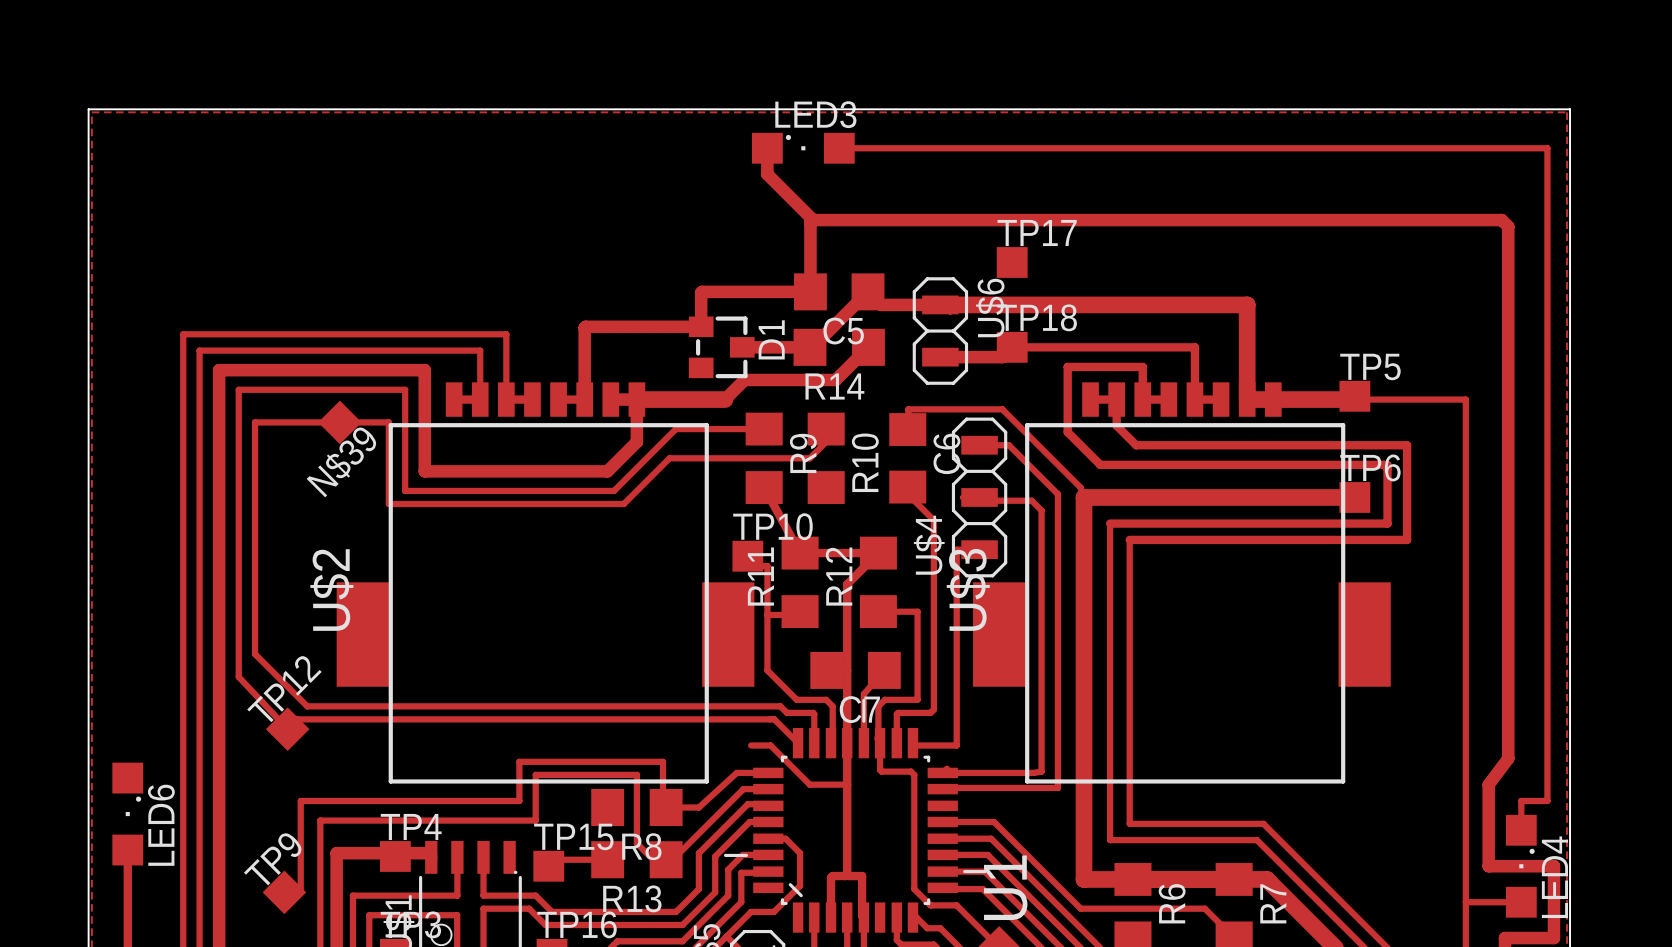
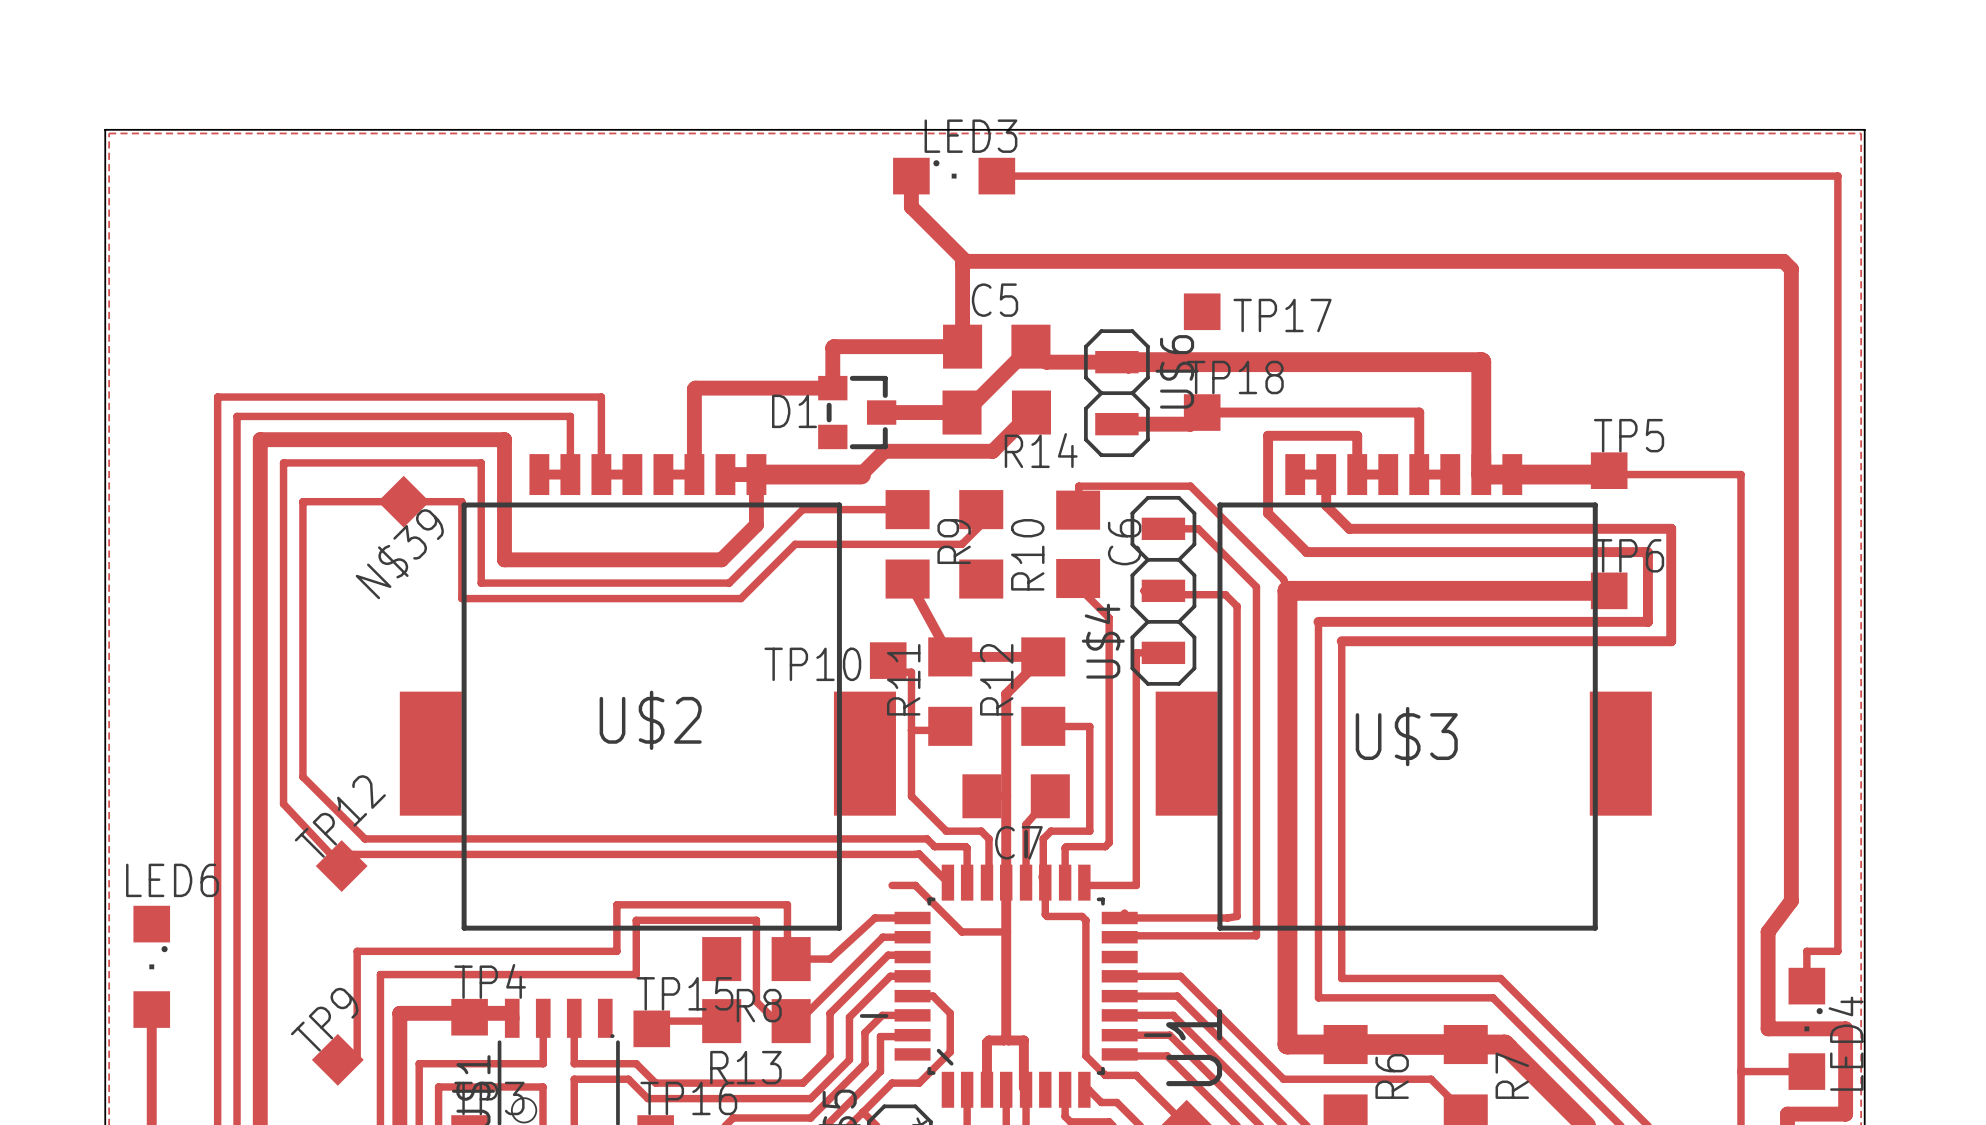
TP17 name position: TP17 (1037, 232) -> TP17 (1282, 315)
C5 name position: C5 (843, 331) -> C5 (995, 300)
D1 name rotation: 0° (771, 339) -> 90° clockwise (794, 411)
D1 name position: D1 (771, 339) -> D1 (794, 411)
R14 name position: R14 (834, 386) -> R14 (1041, 450)
TP10 name position: TP10 (772, 526) -> TP10 (812, 664)
U$3 name rotation: 0° (968, 589) -> 90° clockwise (1406, 736)
U$3 name position: U$3 (968, 589) -> U$3 (1406, 736)
U$2 name rotation: 0° (331, 590) -> 90° clockwise (650, 720)
U$2 name position: U$2 (331, 590) -> U$2 (650, 720)
LED6 name rotation: 0° (161, 825) -> 90° clockwise (172, 880)

